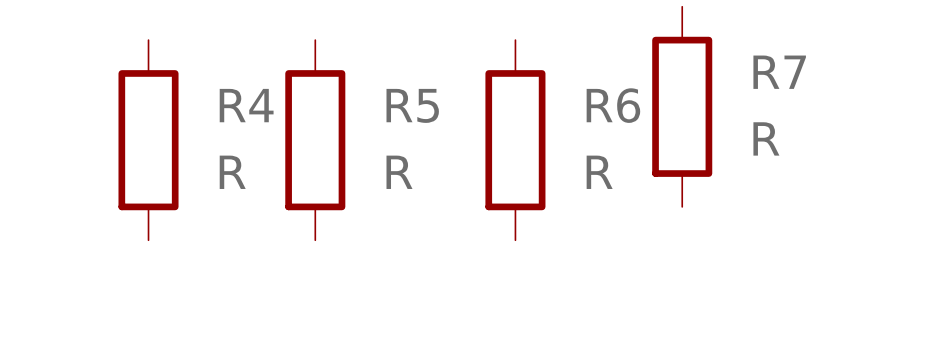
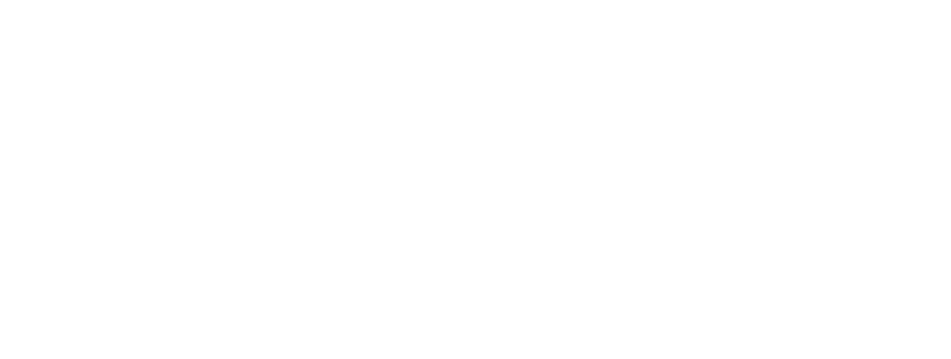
R7: R (682, 106) -> none
R4: R (148, 140) -> none
R5: R (315, 140) -> none
R6: R (515, 140) -> none

